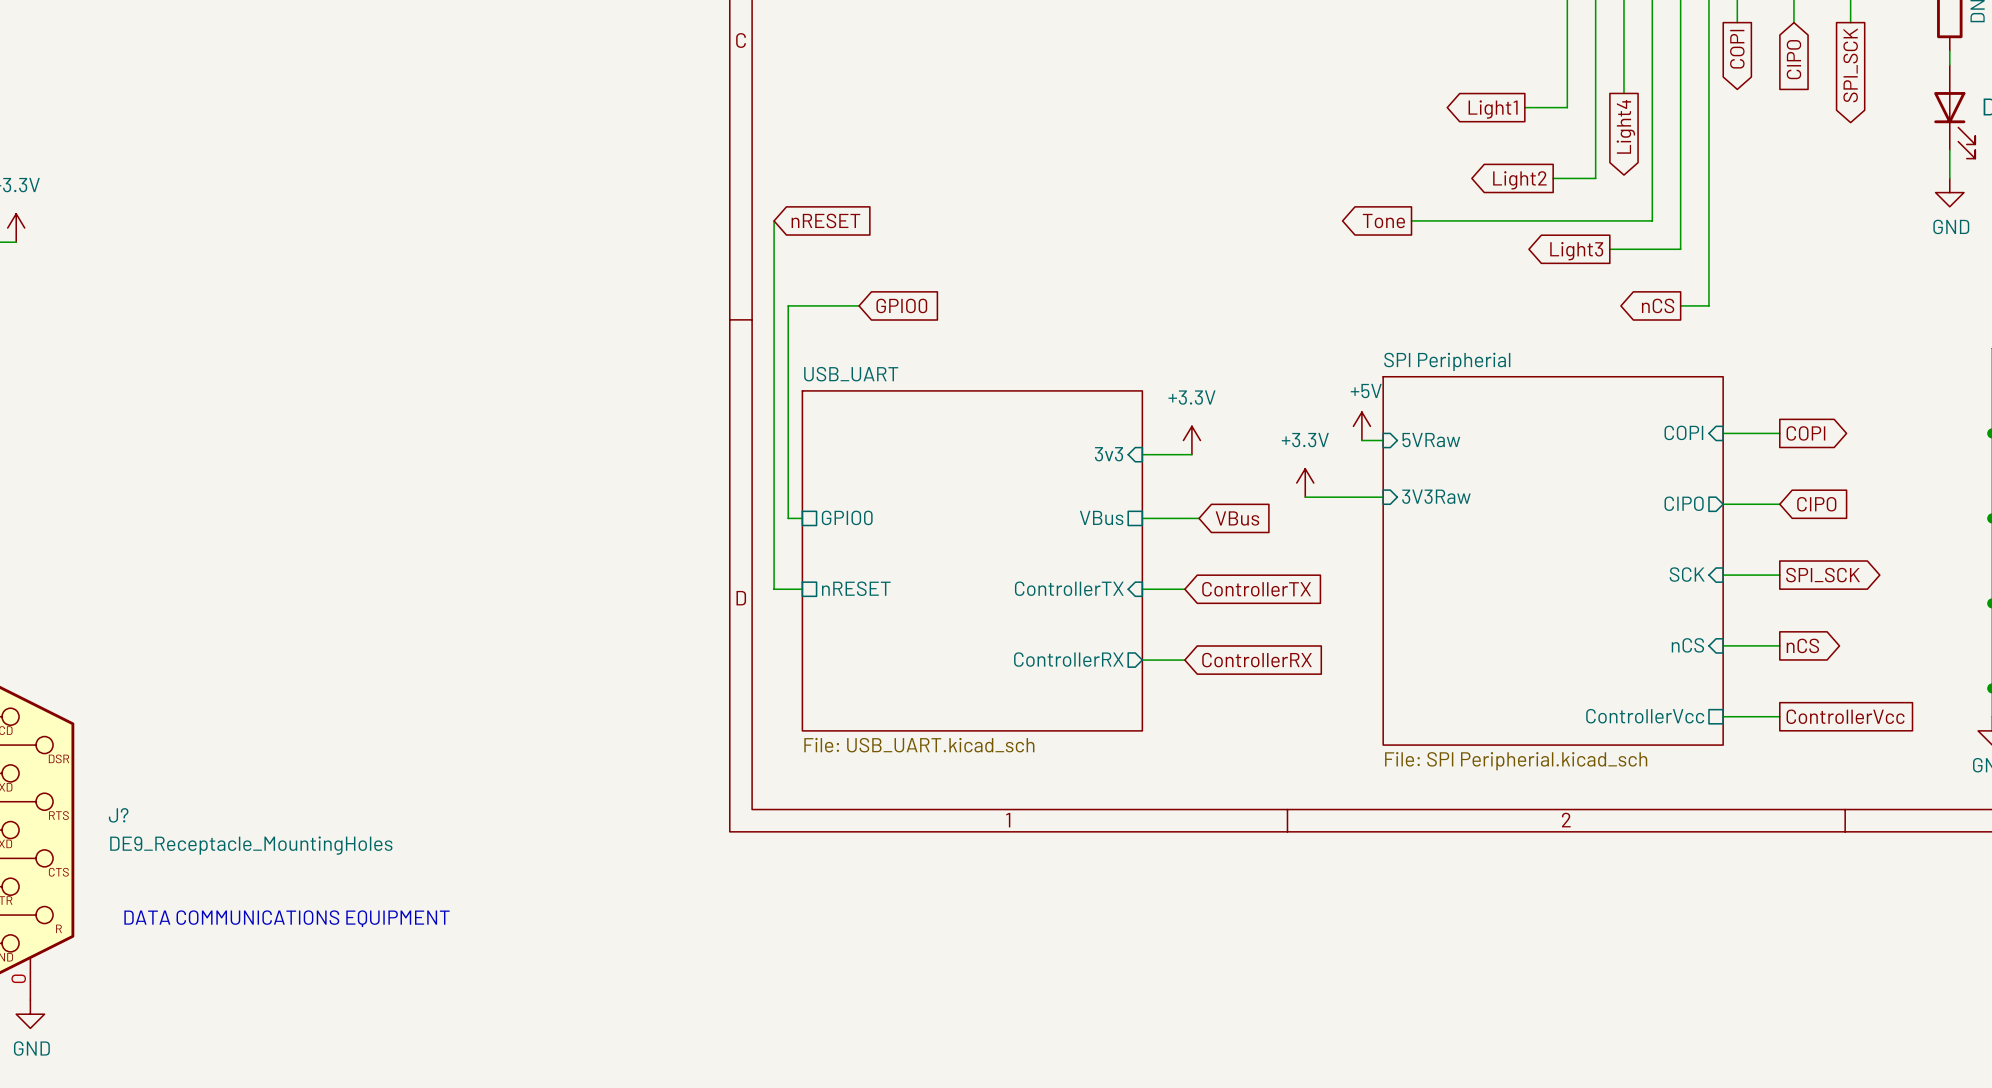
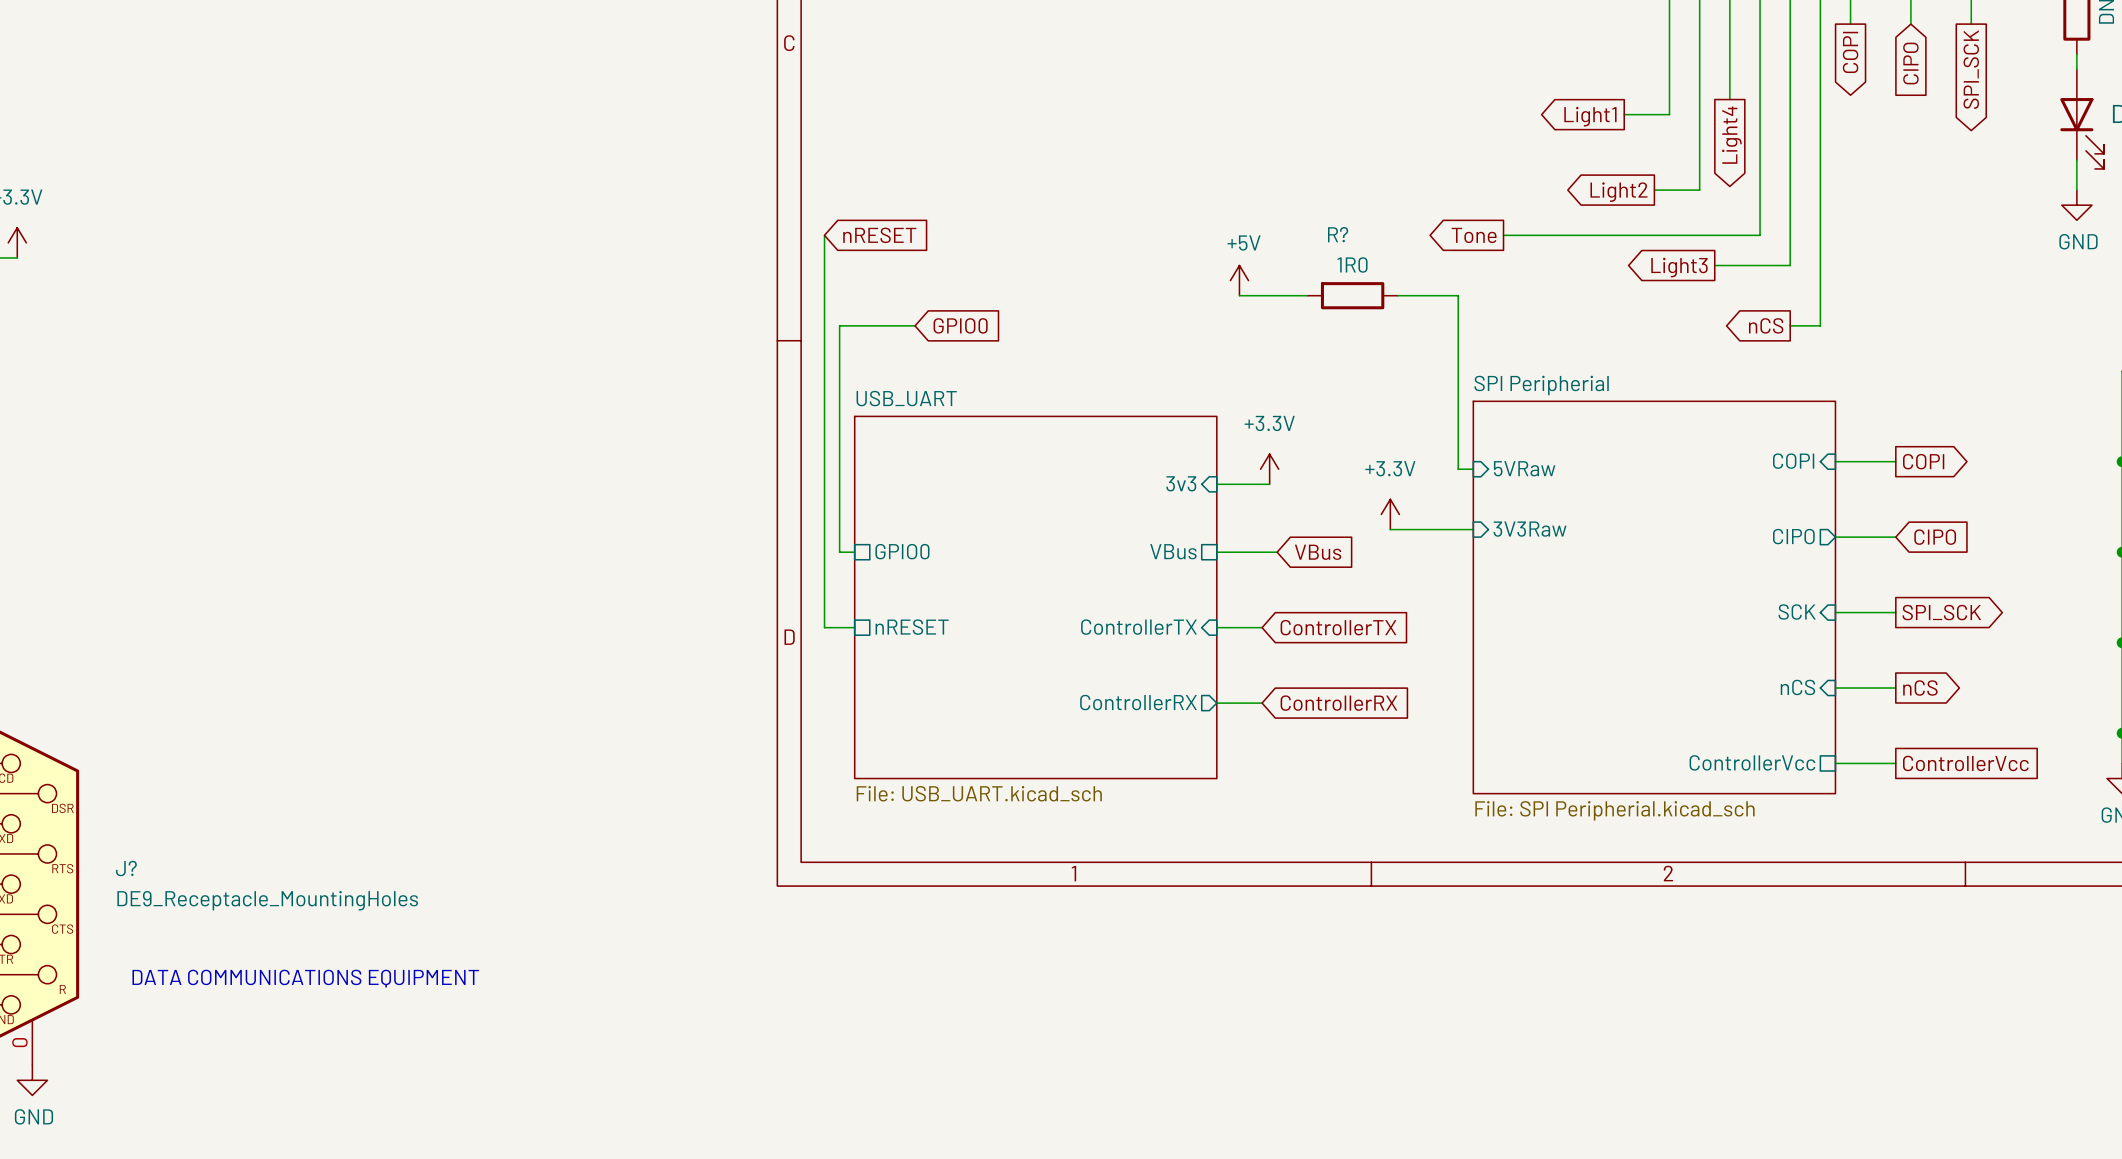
wire: none -> (1239, 295) (1307, 295)
R?: none -> 1R0 (1352, 295)
power symbol position: +5V (1361, 426) -> +5V (1239, 280)
wire: (1361, 440) (1369, 440) -> (1397, 295) (1458, 295) (1458, 469)

